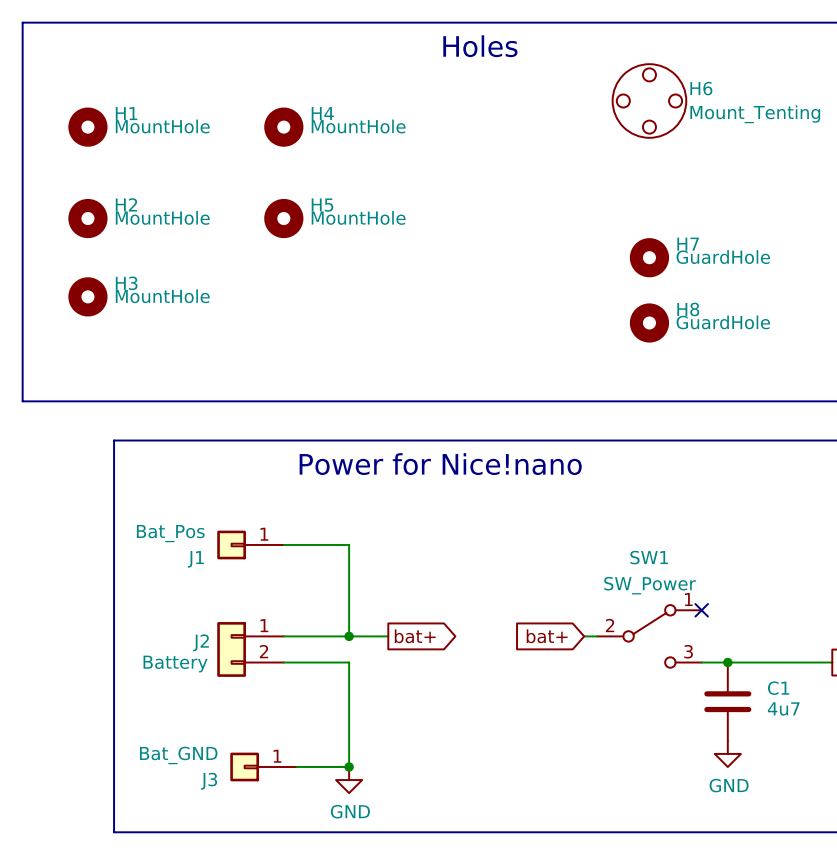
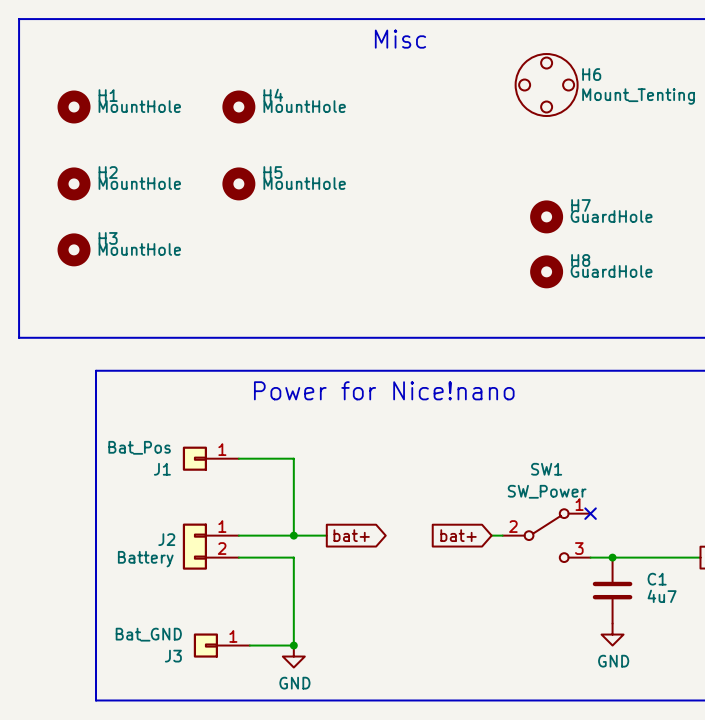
text: Holes (480, 46) -> Misc (400, 39)

